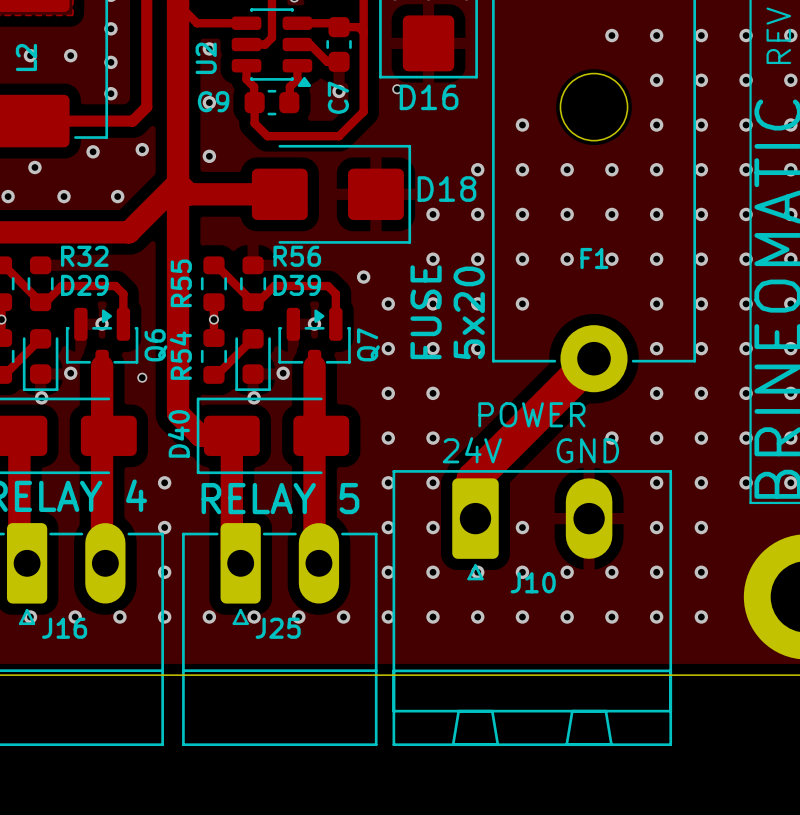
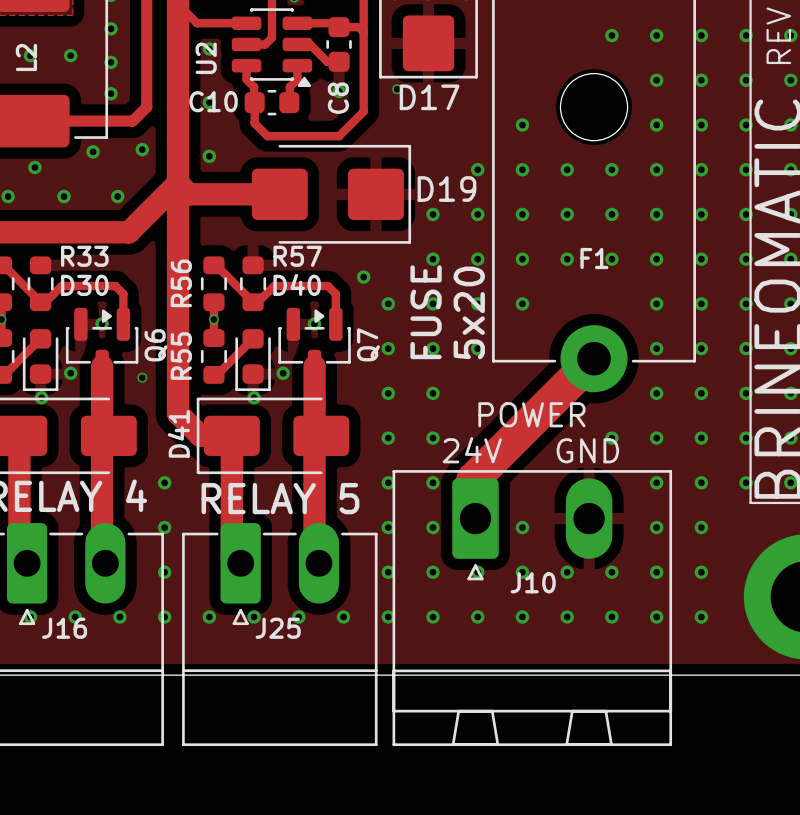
C7 name: C7 (338, 97) -> C8 (338, 98)
D16 name: D16 (429, 97) -> D17 (429, 97)
C9 name: C9 (213, 101) -> C10 (213, 101)
D18 name: D18 (446, 189) -> D19 (446, 189)
R32 name: R32 (84, 256) -> R33 (84, 256)
R56 name: R56 (297, 256) -> R57 (297, 256)
R55 name: R55 (181, 283) -> R56 (181, 283)
D29 name: D29 (84, 285) -> D30 (84, 285)
D39 name: D39 (297, 285) -> D40 (297, 284)
R54 name: R54 (180, 355) -> R55 (181, 356)
D40 name: D40 (178, 433) -> D41 (178, 433)

